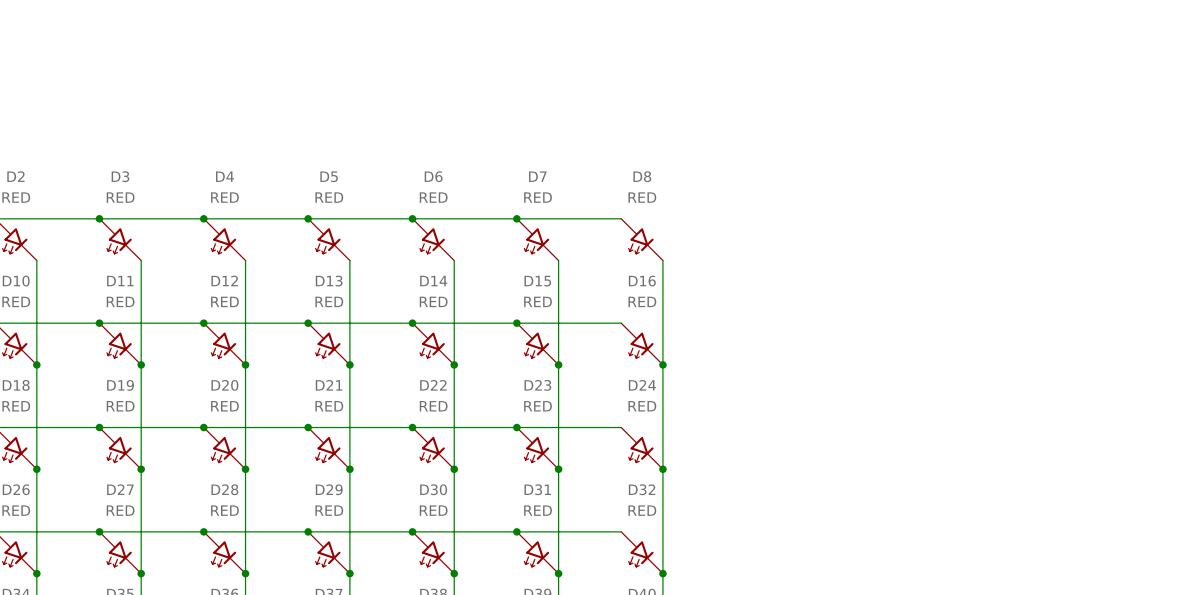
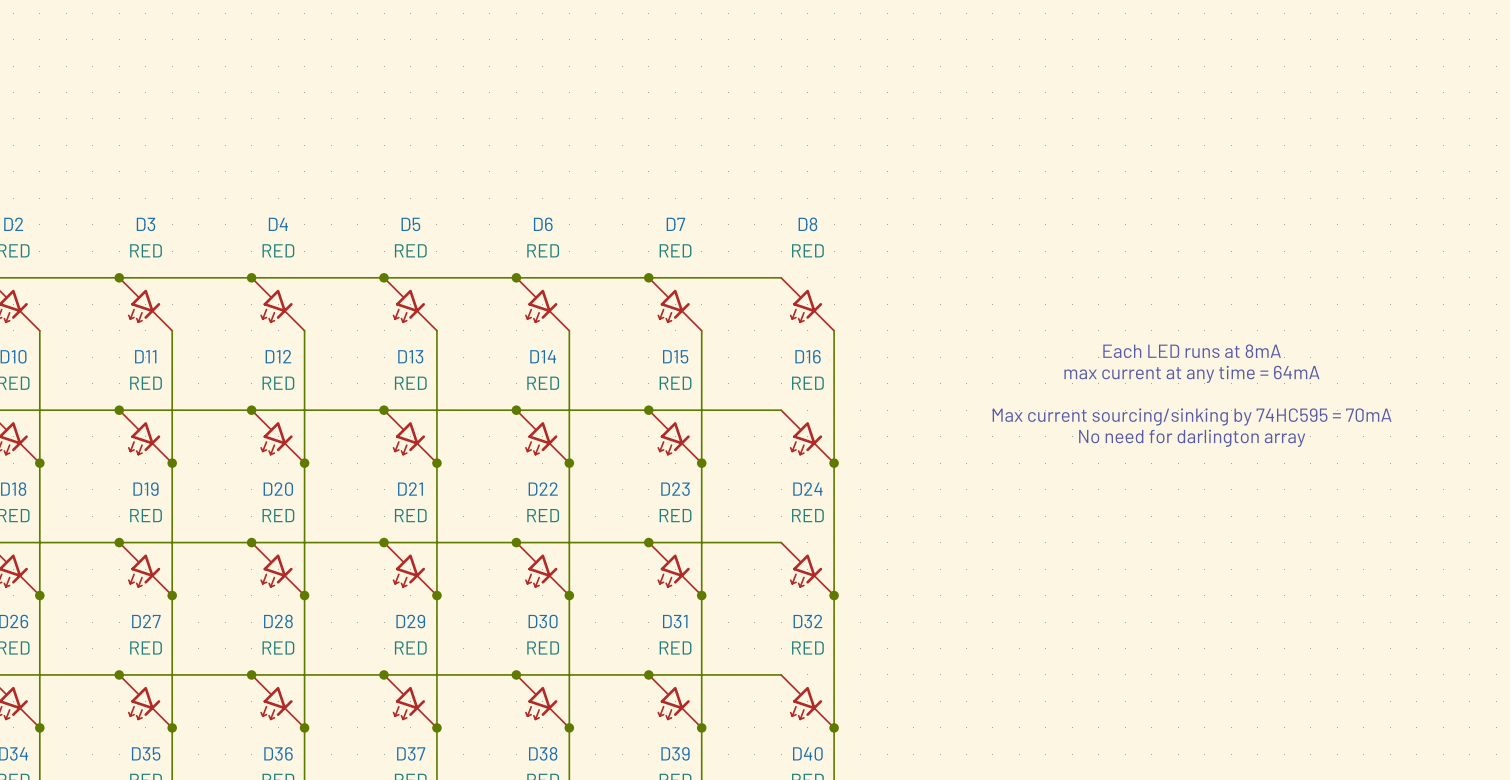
text: none -> Each LED runs at 8mA (1192, 351)
text: none -> max current at any time = 64mA (1191, 374)
text: none -> Max current sourcing/sinking by 74HC595 = 70mA (1192, 416)
text: none -> No need for darlington array (1192, 438)

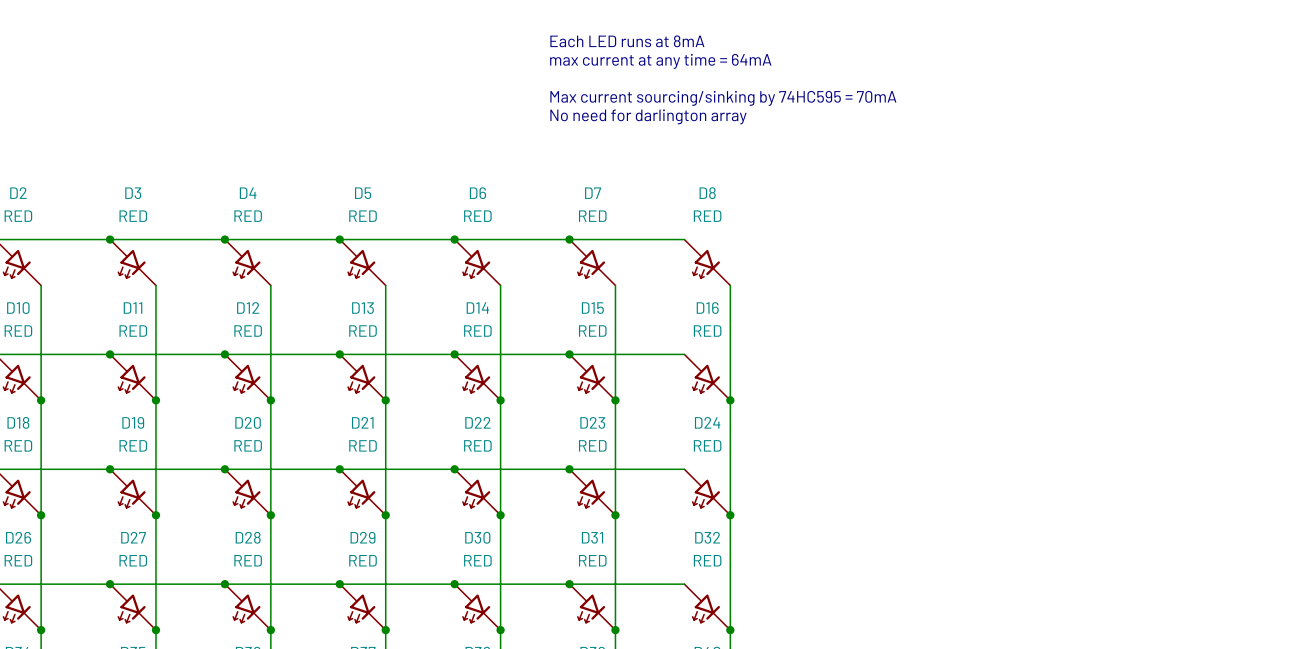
text: none -> Each LED runs at 8mA (627, 41)
text: none -> max current at any time = 64mA (660, 61)
text: none -> Max current sourcing/sinking by 74HC595 = 70mA (723, 98)
text: none -> No need for darlington array (648, 116)
text: Each LED runs at 8mA (1192, 351) -> none
text: max current at any time = 64mA (1191, 374) -> none
text: Max current sourcing/sinking by 74HC595 = 70mA (1192, 416) -> none
text: No need for darlington array (1192, 438) -> none

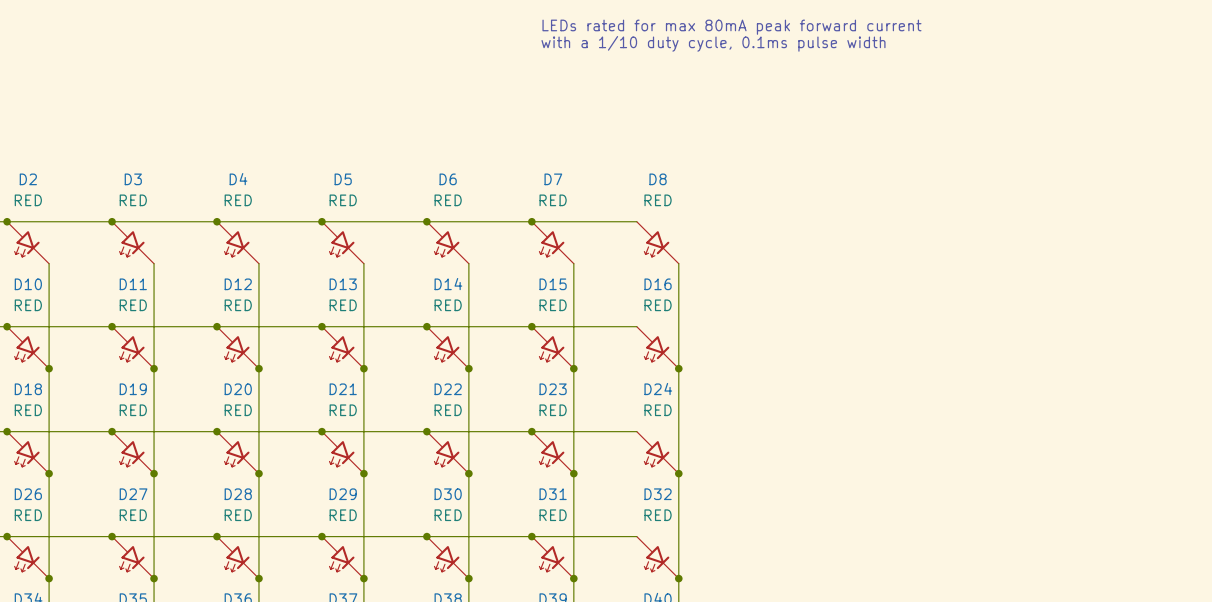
text: none -> LEDs rated for max 80mA peak forward current (731, 27)
text: Each LED runs at 8mA (627, 41) -> none
text: none -> with a 1/10 duty cycle, 0.1ms pulse width (713, 43)
text: max current at any time = 64mA (660, 61) -> none
text: Max current sourcing/sinking by 74HC595 = 70mA (723, 98) -> none
text: No need for darlington array (648, 116) -> none

